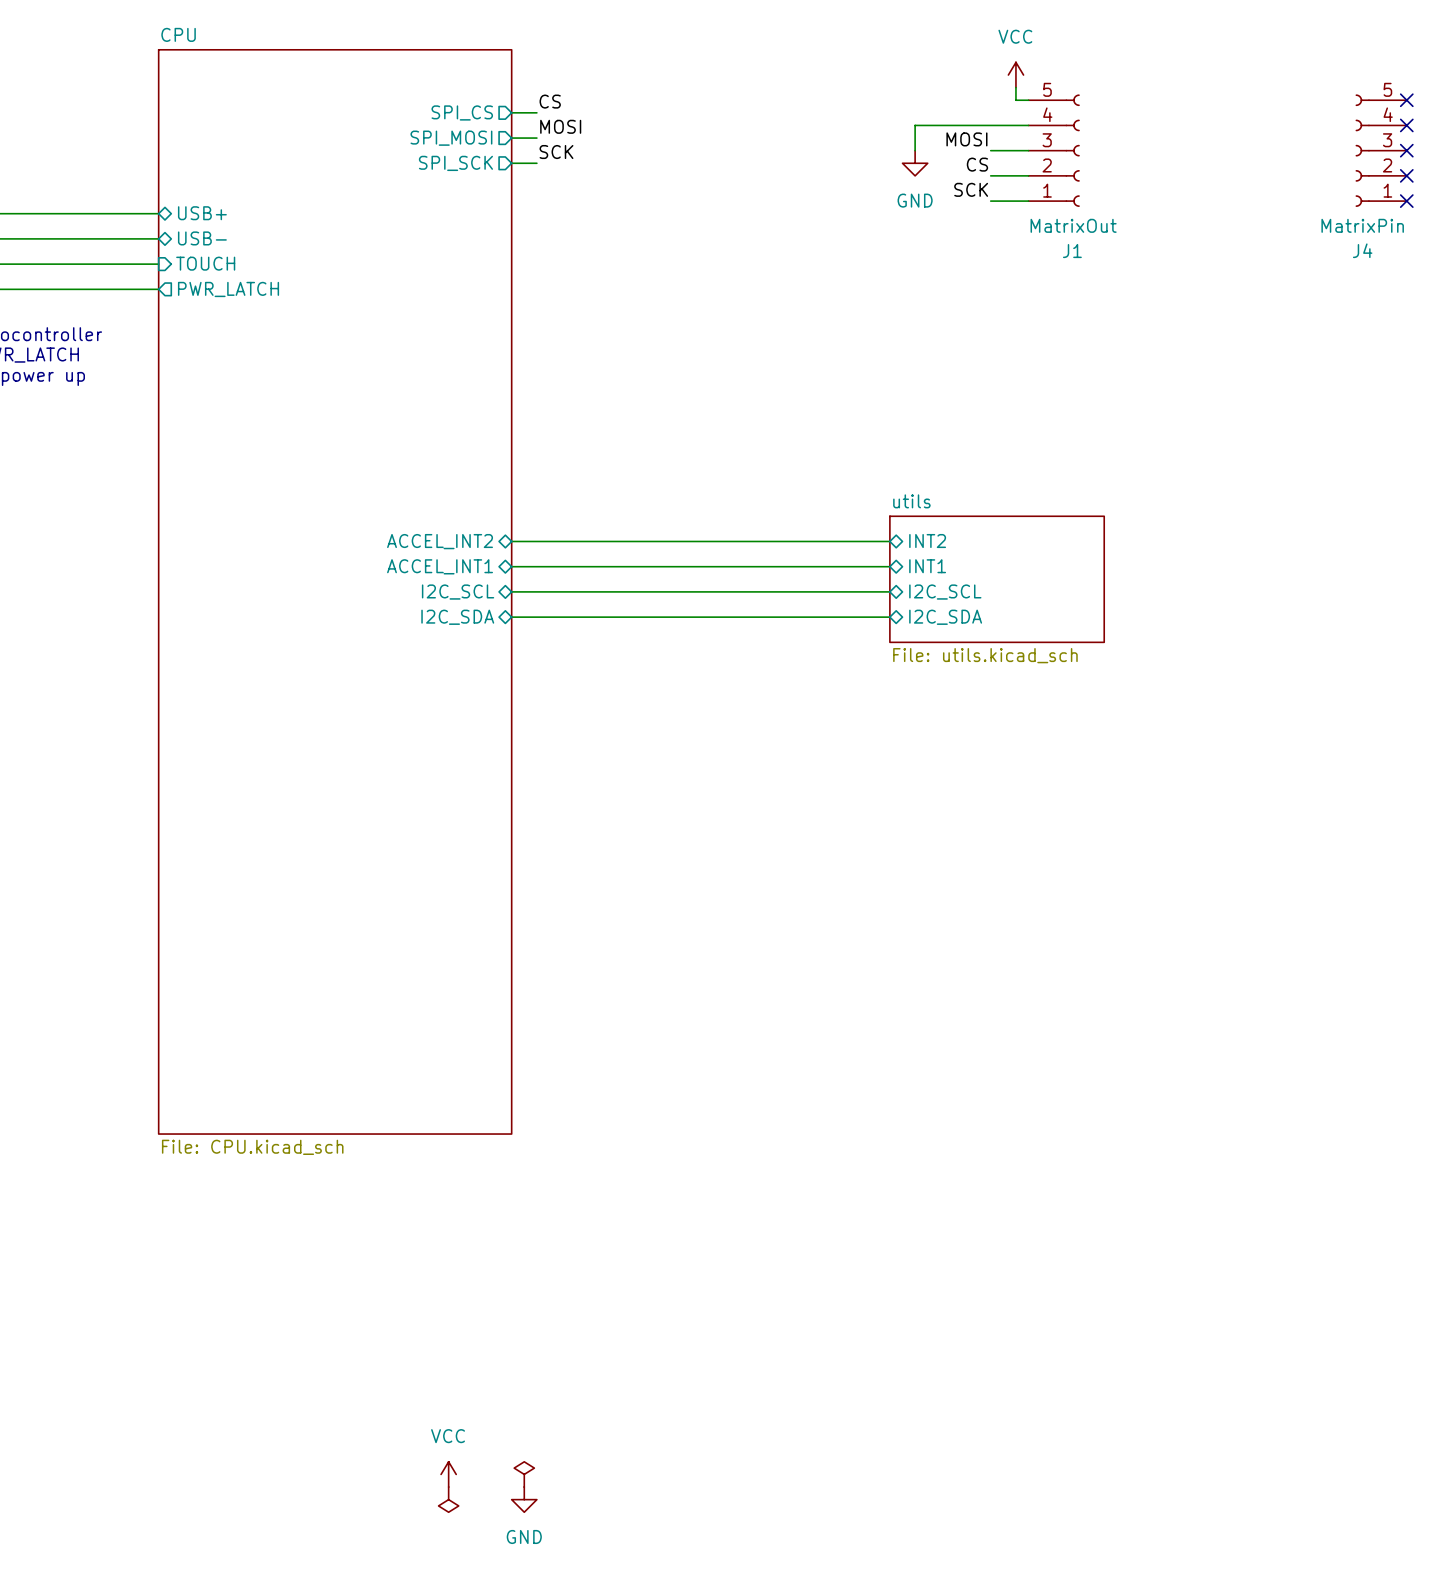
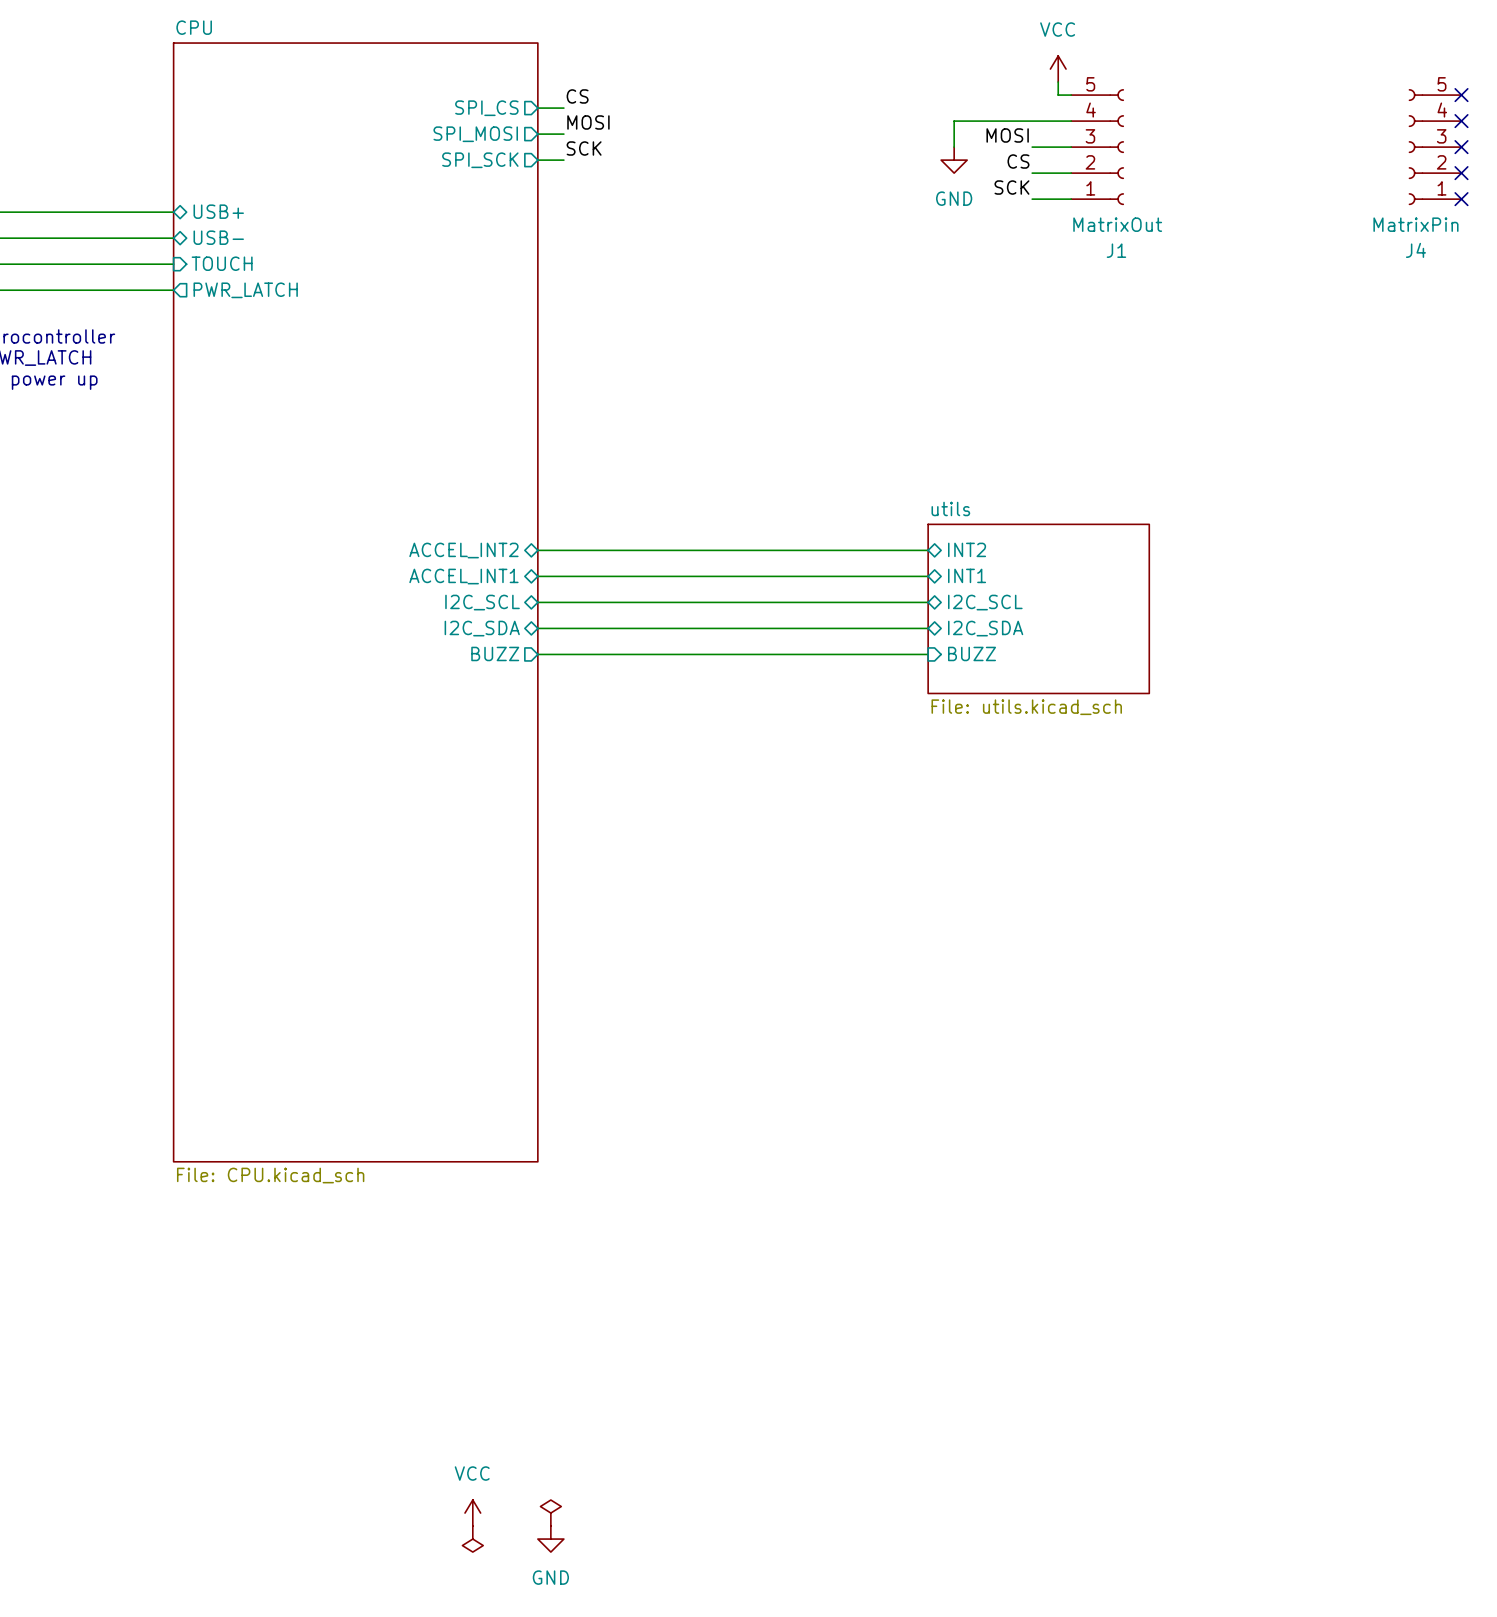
sheet utils: File: utils.kicad_sch (997, 579) -> none
sheet utils: none -> File: utils.kicad_sch (1038, 608)
sheet pin: none -> BUZZ (495, 653)
sheet pin: none -> BUZZ (972, 653)
wire: none -> (537, 654) (928, 654)

